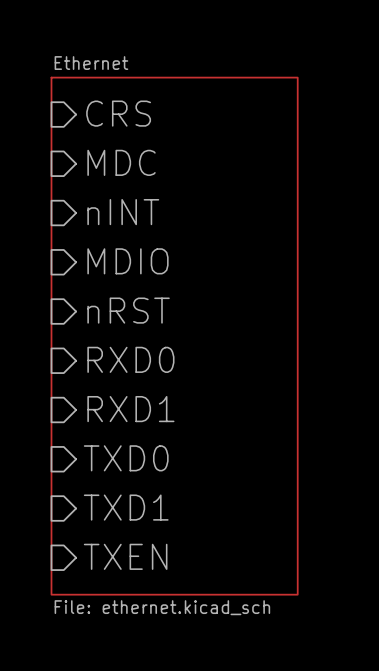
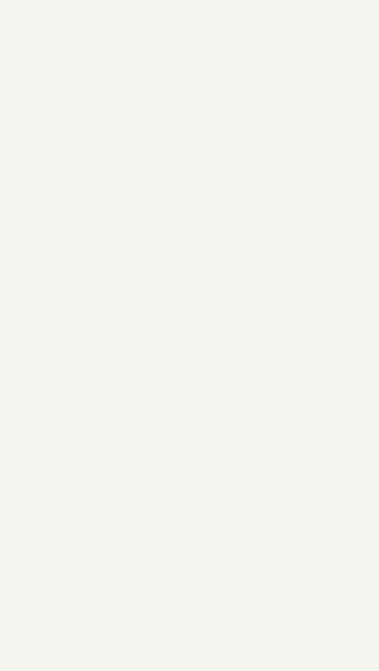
sheet pin: CRS (118, 113) -> none
sheet pin: MDC (121, 162) -> none
sheet pin: nINT (123, 212) -> none
sheet pin: MDIO (127, 261) -> none
sheet pin: nRST (128, 310) -> none
sheet Ethernet: File: ethernet.kicad_sch (174, 336) -> none
sheet pin: RXD0 (130, 359) -> none
sheet pin: RXD1 (130, 409) -> none
sheet pin: TXD0 (126, 458) -> none
sheet pin: TXD1 (126, 507) -> none
sheet pin: TXEN (125, 556) -> none

